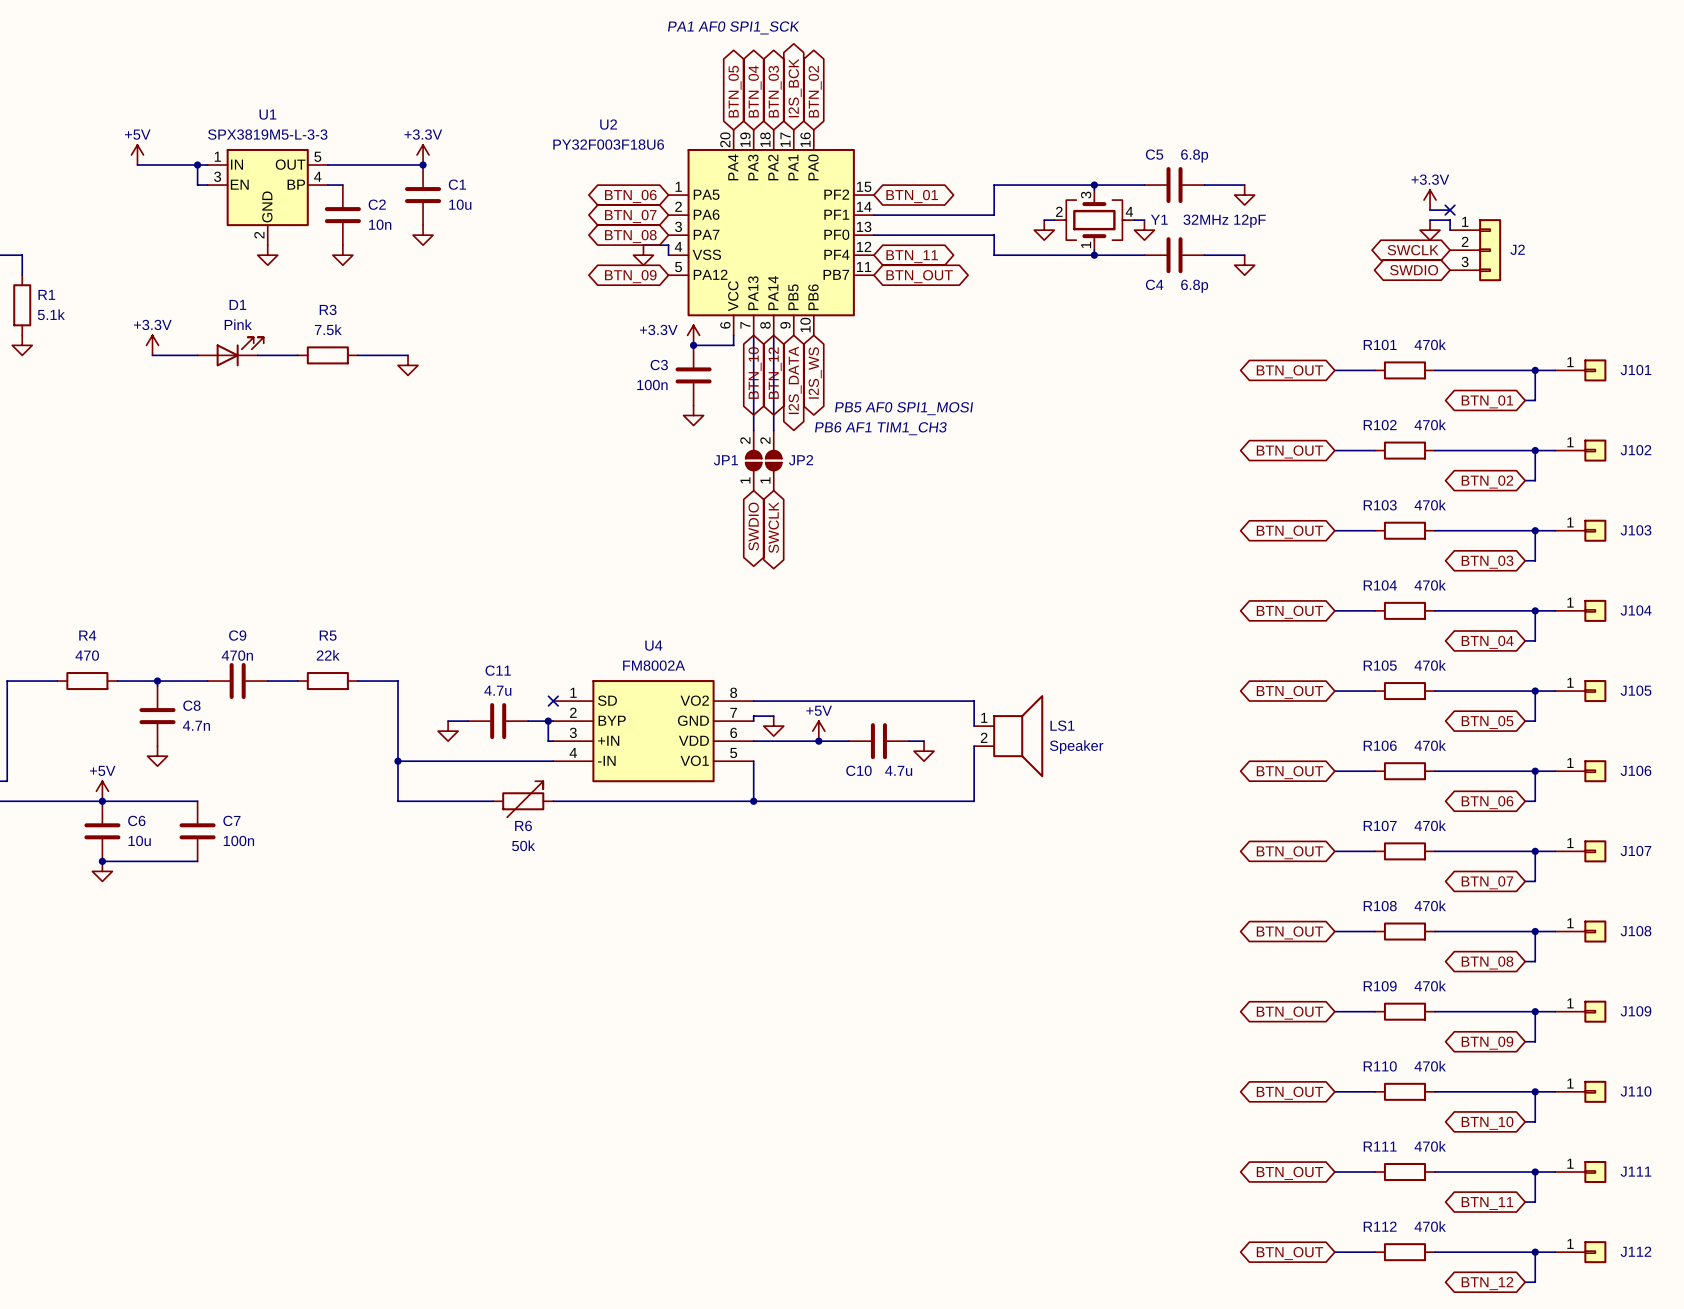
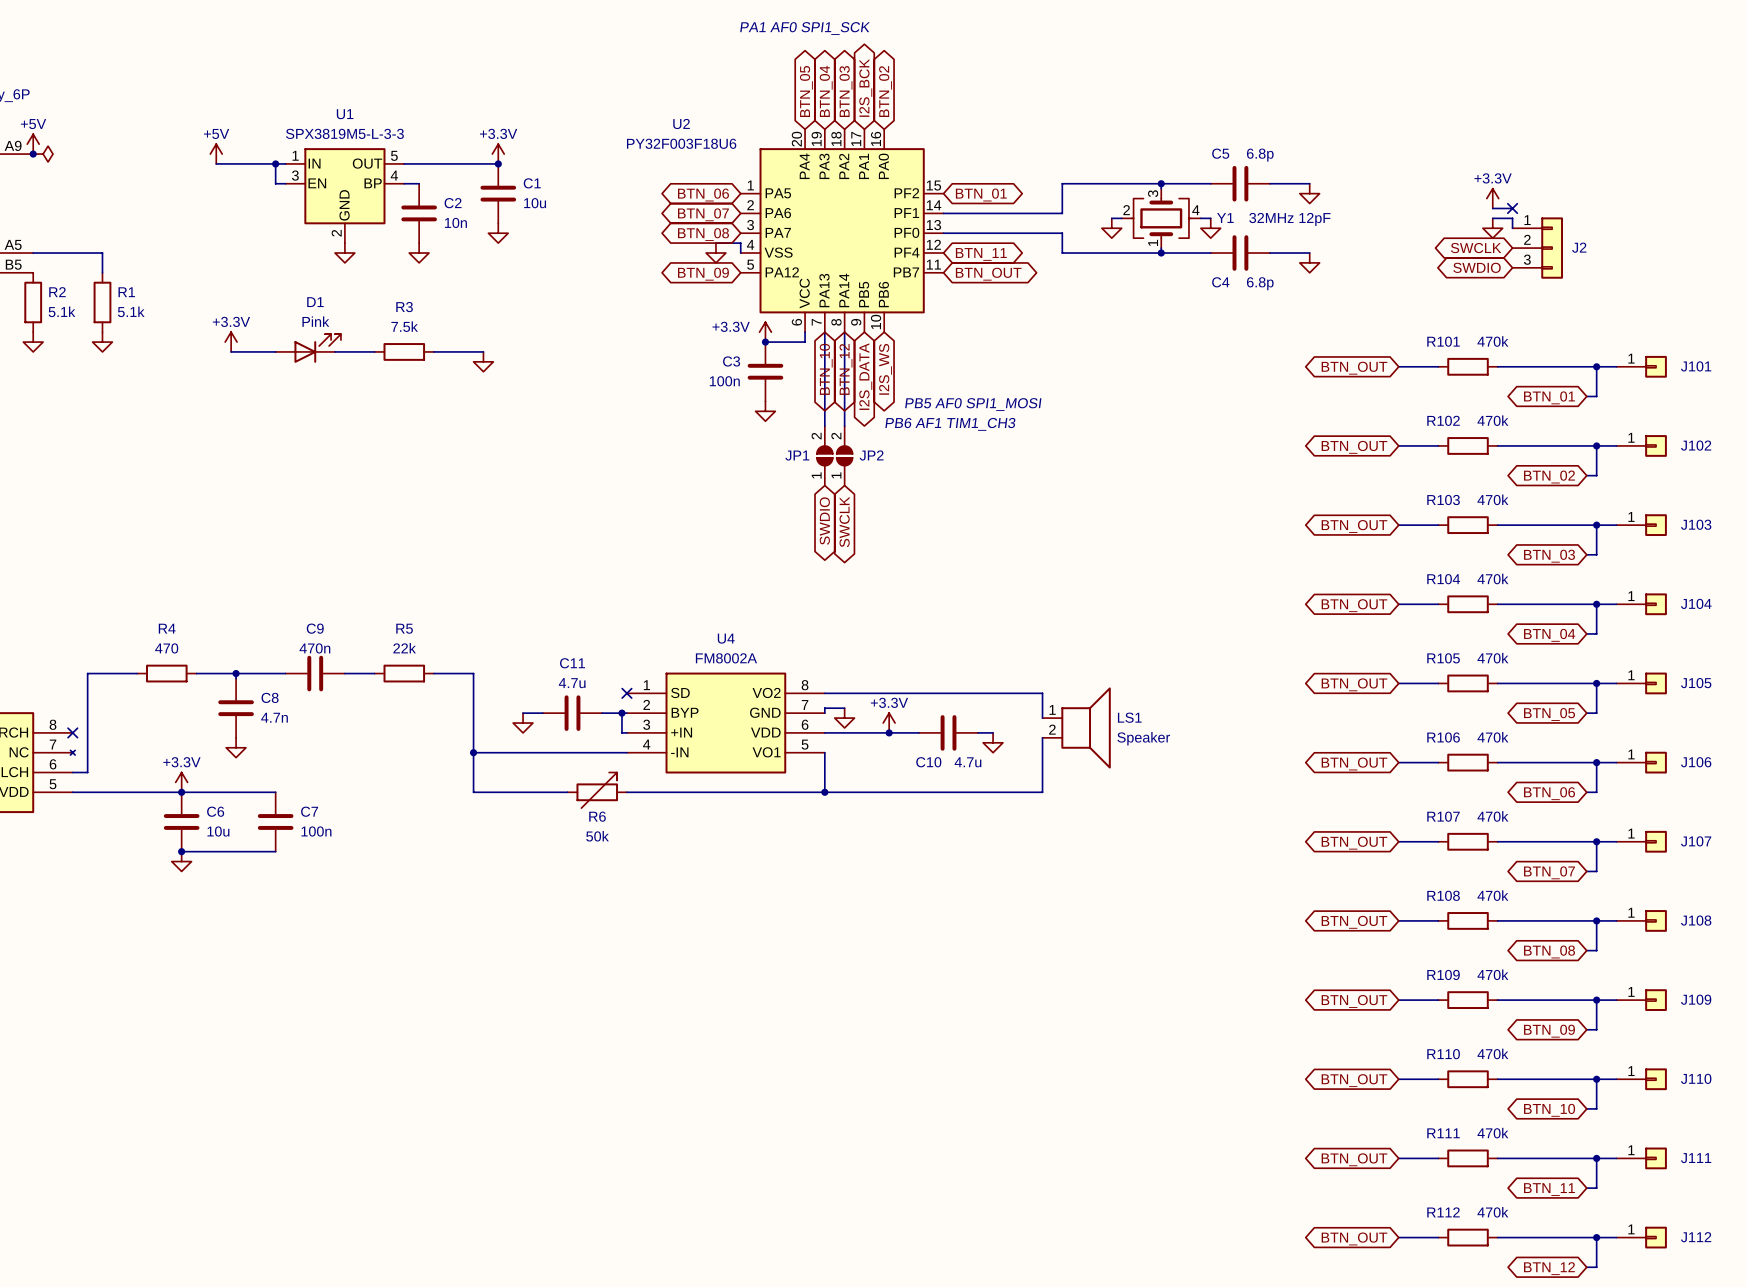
power symbol: +5V (818, 731) -> +3.3V (889, 723)
power symbol: +5V (102, 791) -> +3.3V (181, 782)

